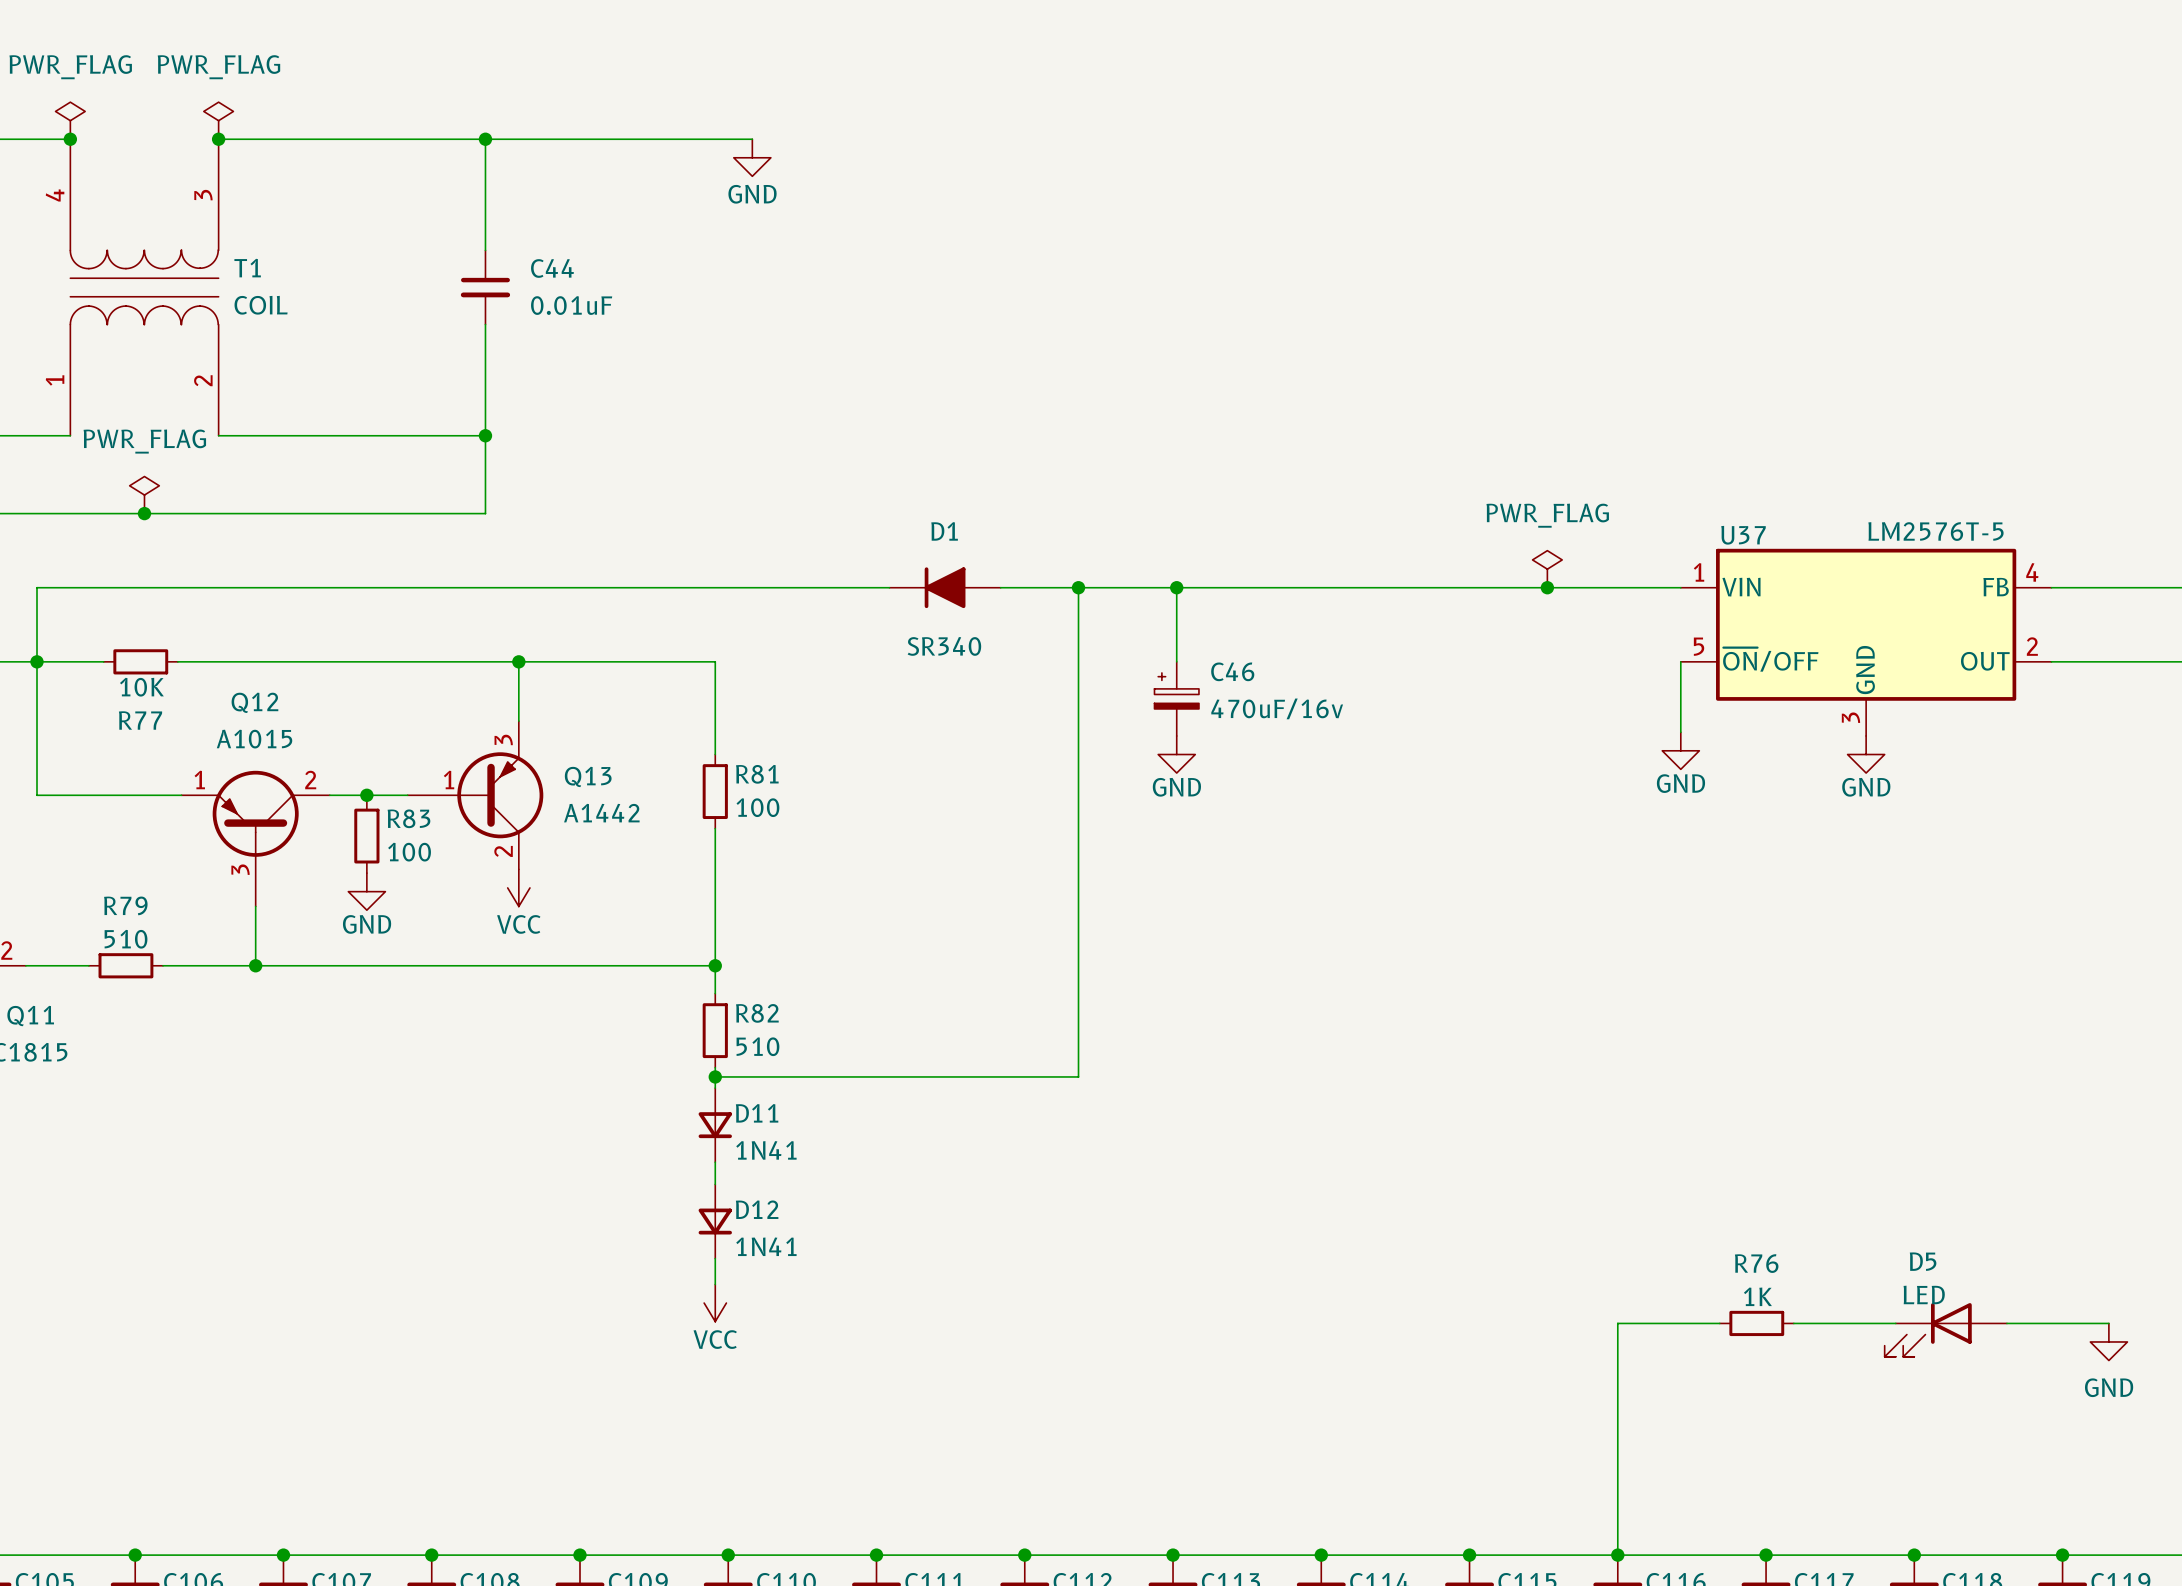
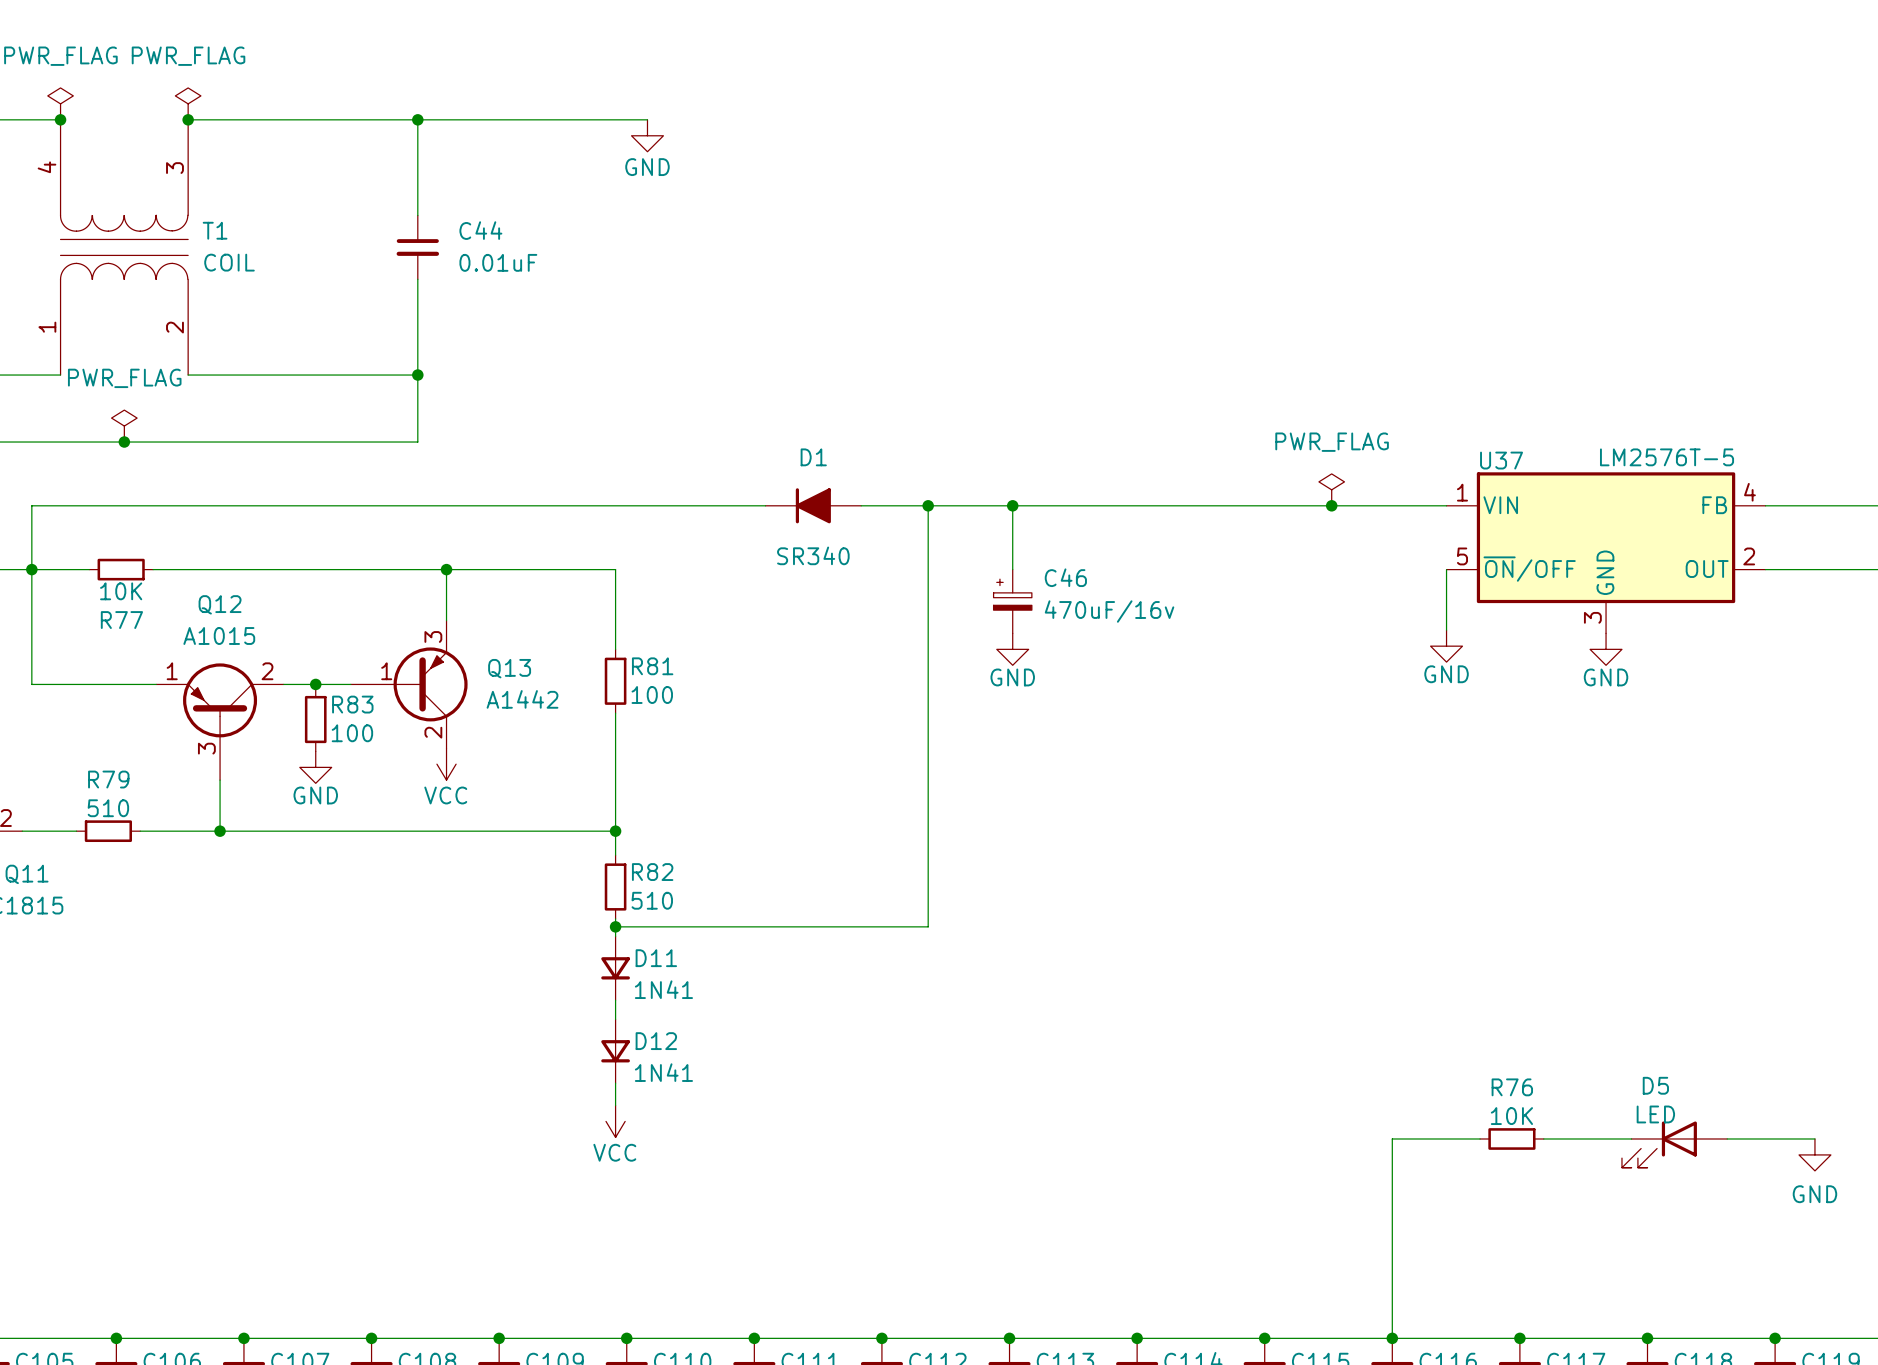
R76 value: 1K (1757, 1296) -> 10K (1511, 1116)

